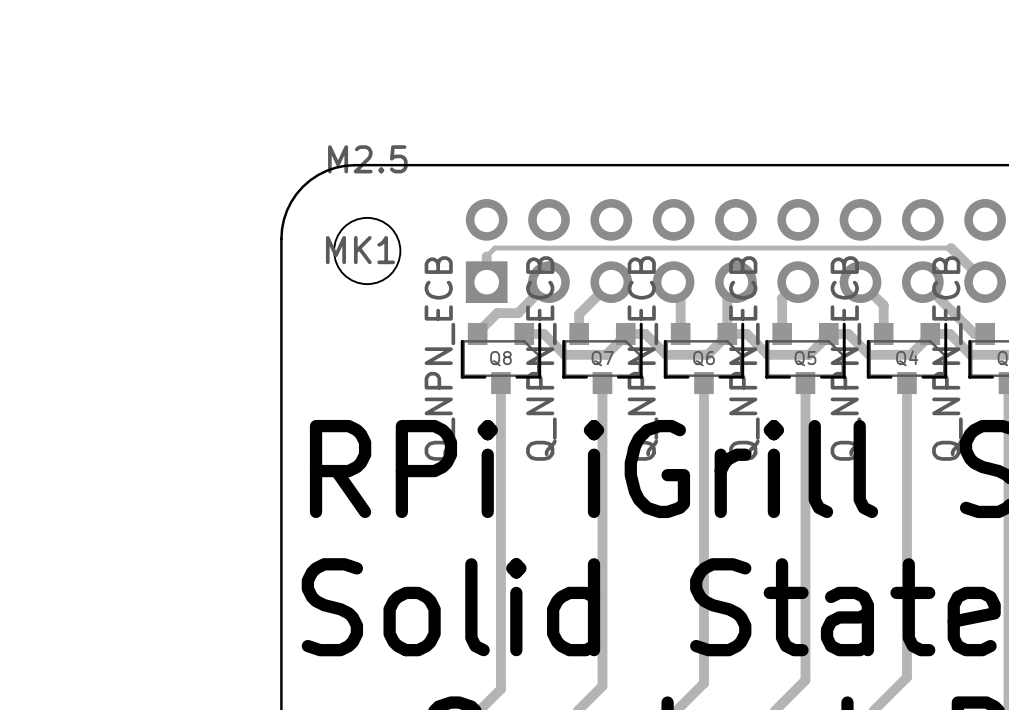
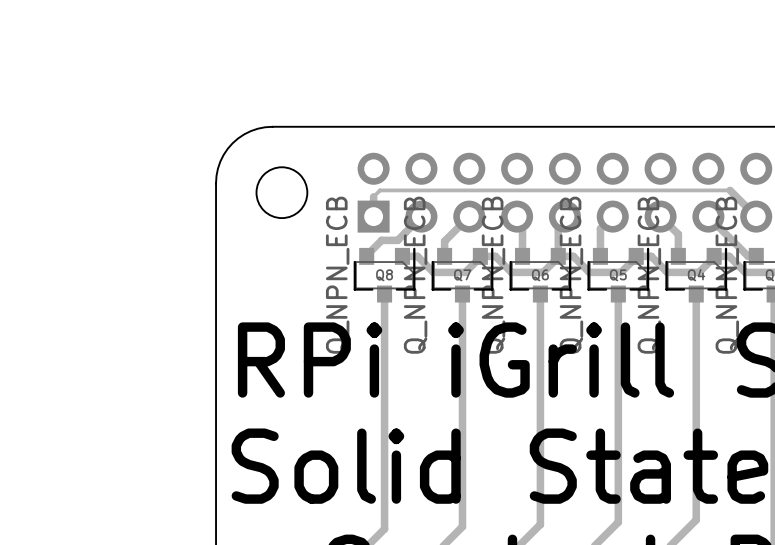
MK1 value: M2.5 (367, 159) -> none
MK1 name: MK1 (360, 250) -> none

